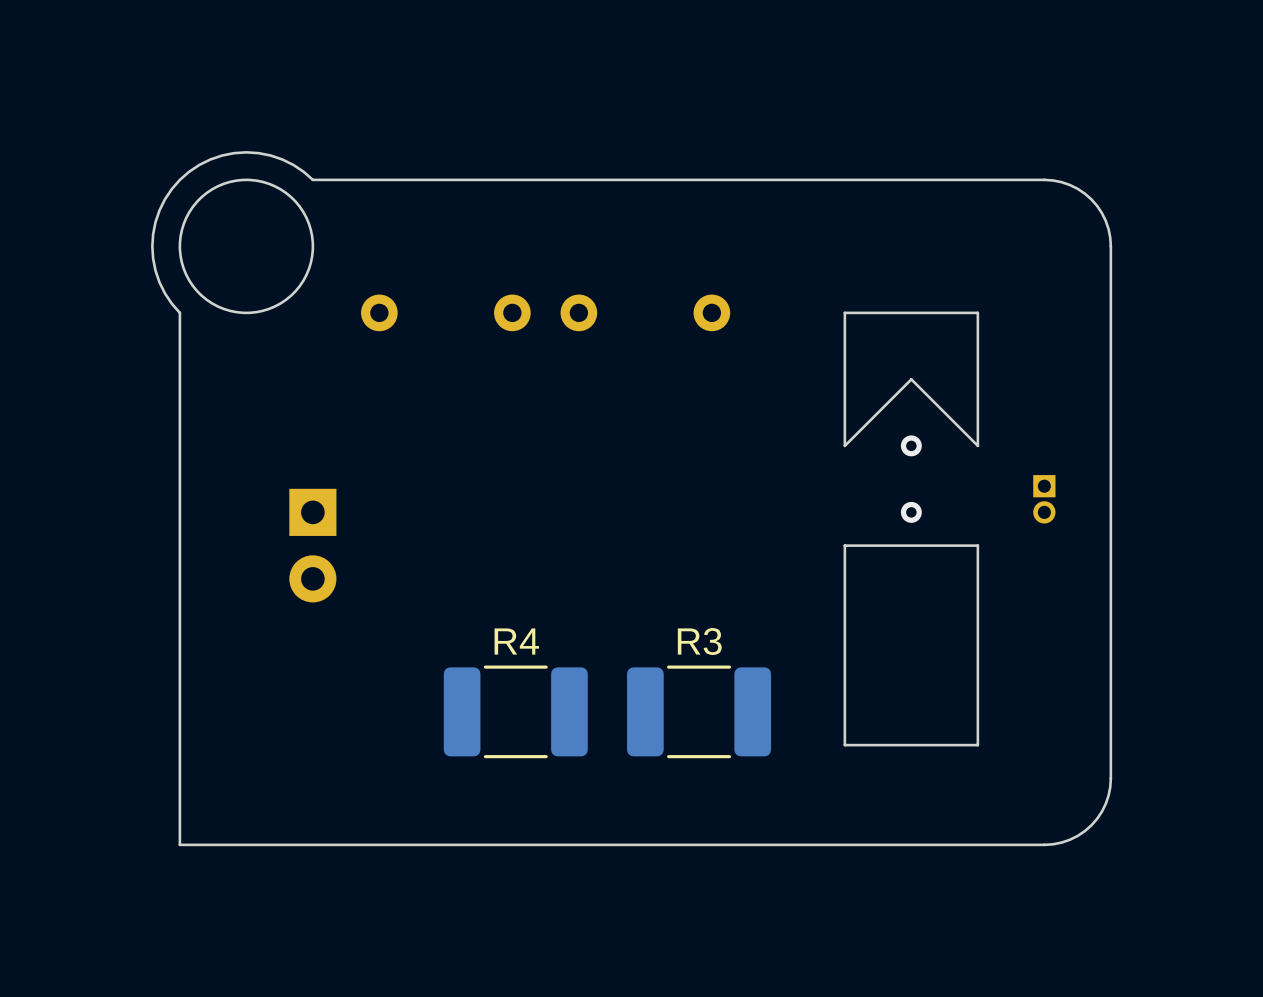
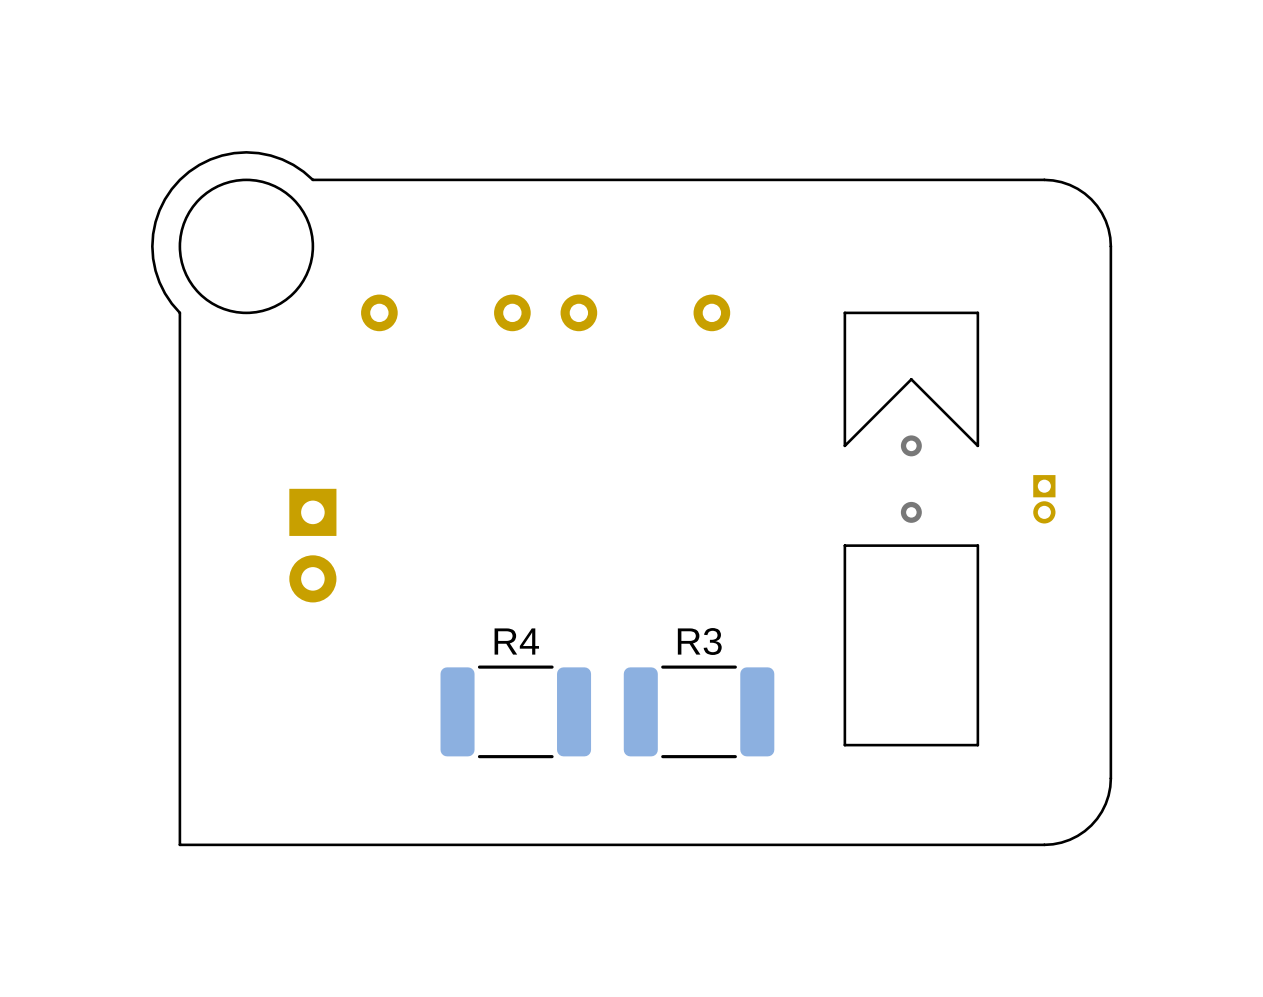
R4 footprint: [443, 665, 588, 759] -> [440, 665, 592, 759]
R3 footprint: [627, 665, 772, 759] -> [623, 665, 775, 759]

